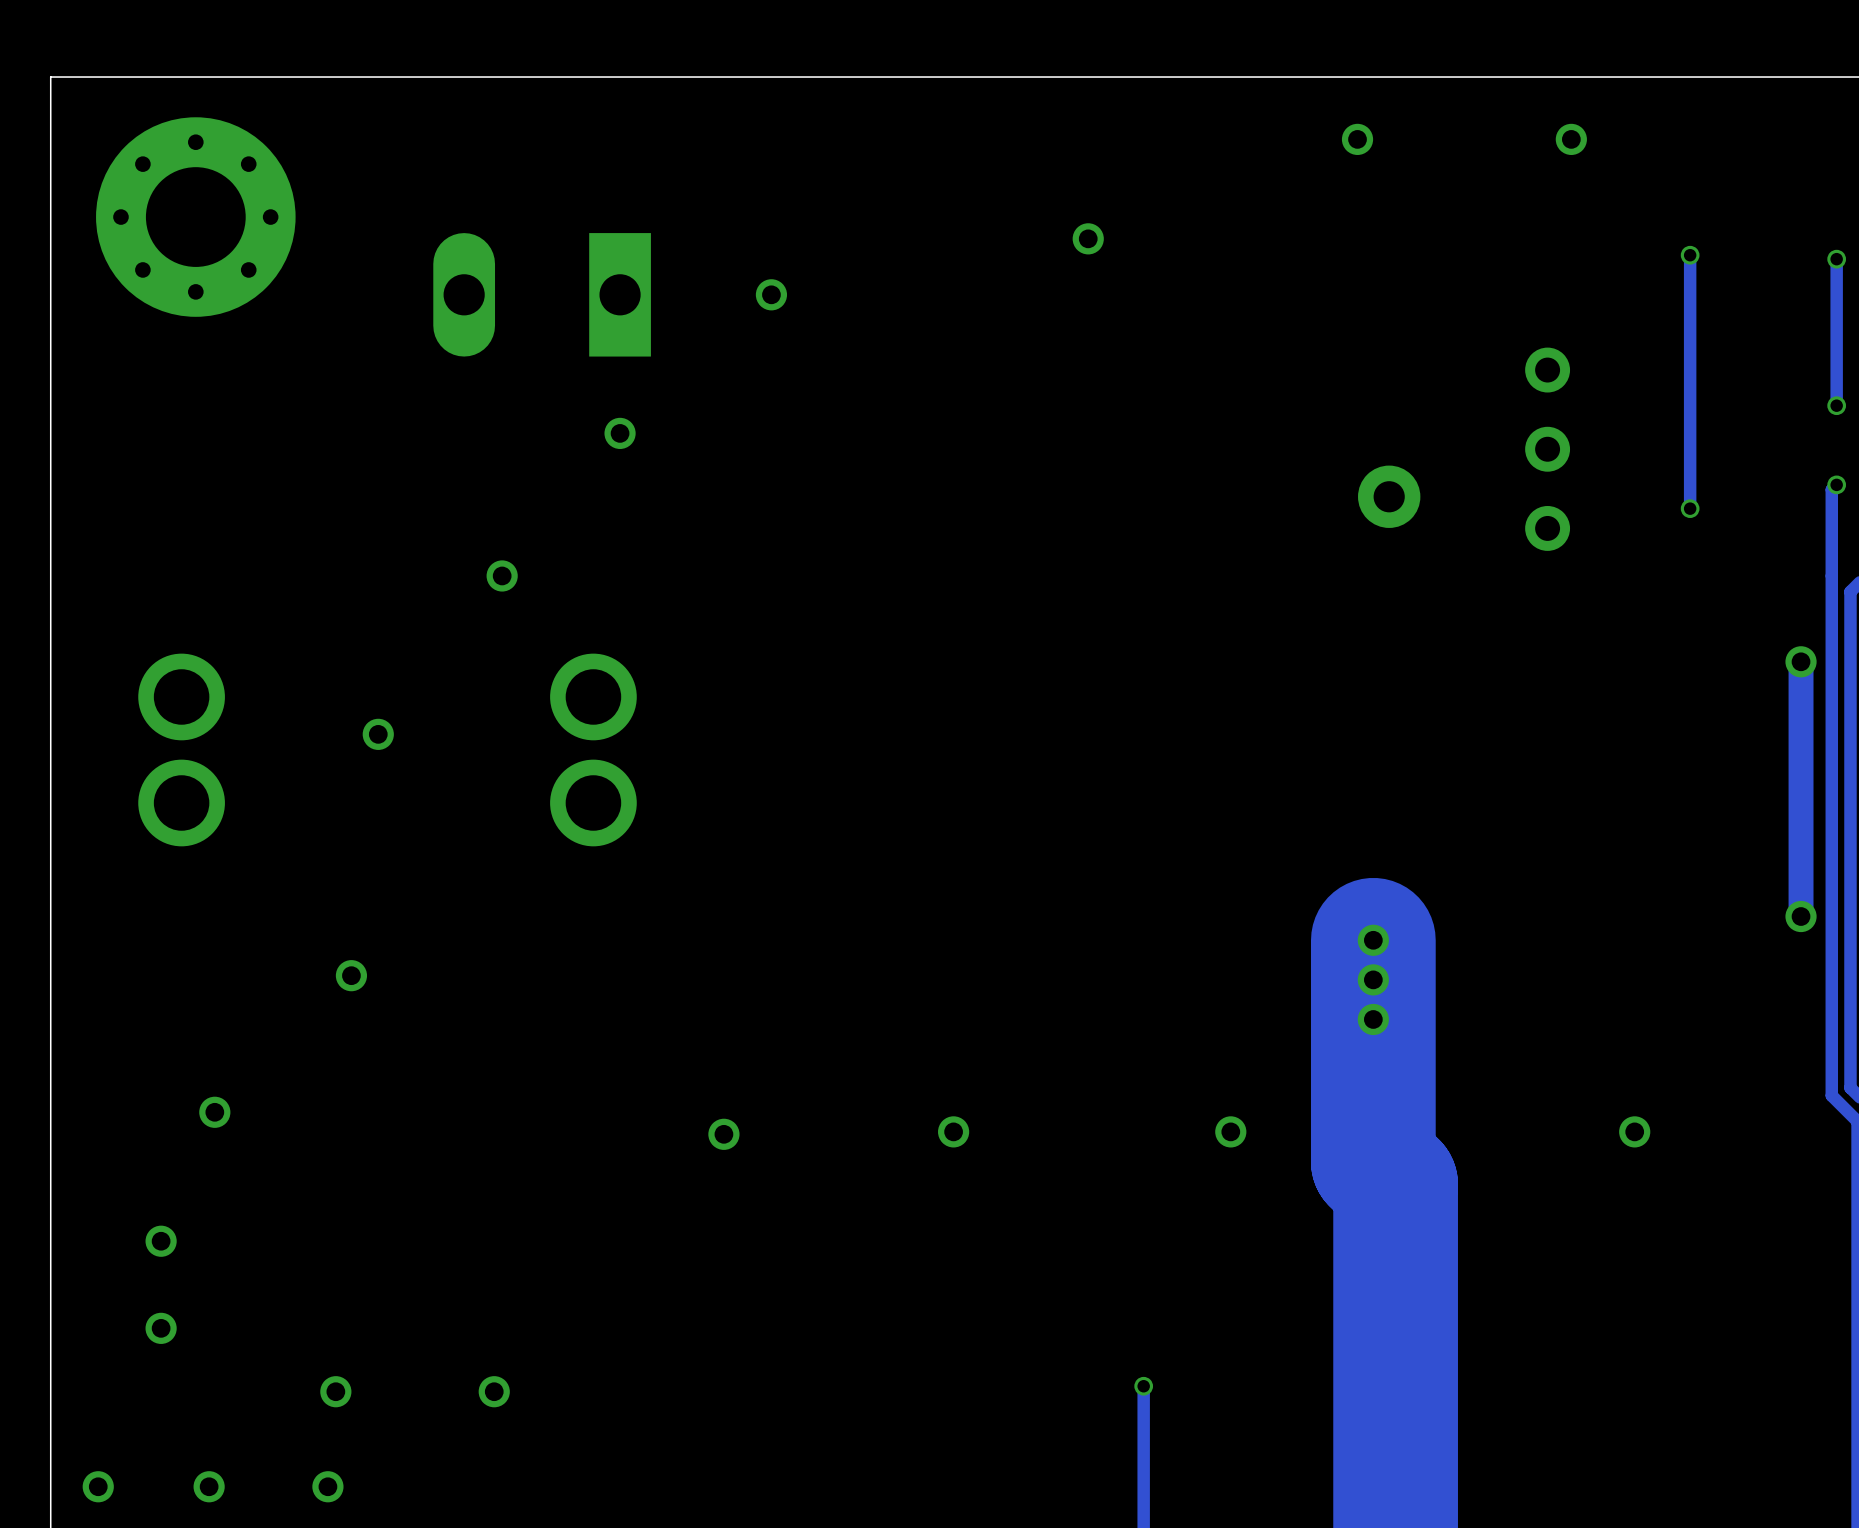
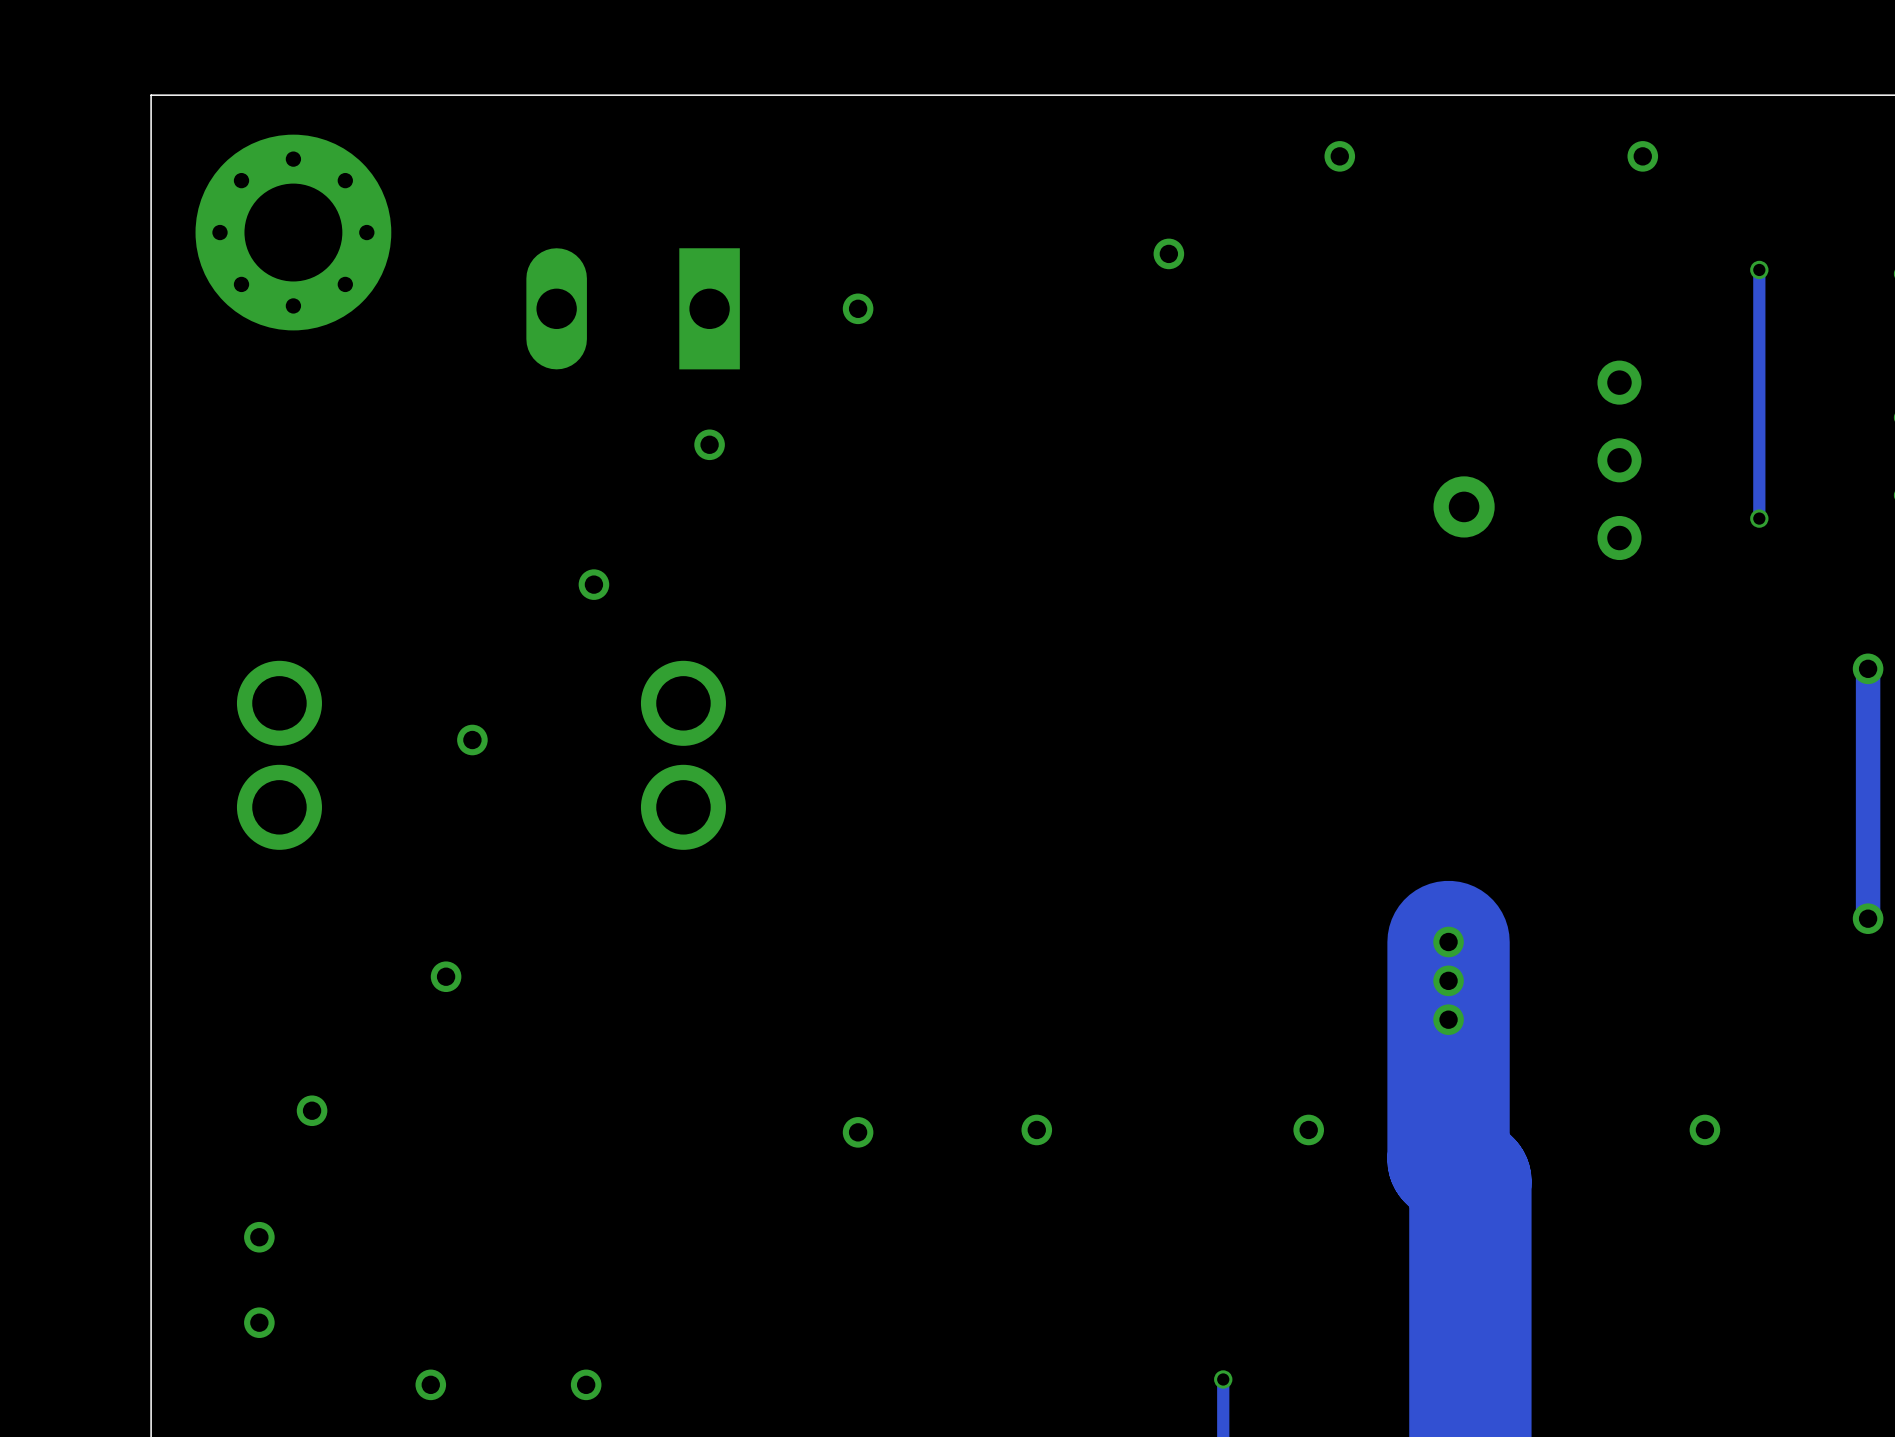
via position: (1357, 139) -> (1339, 156)
via position: (723, 1134) -> (858, 1132)

